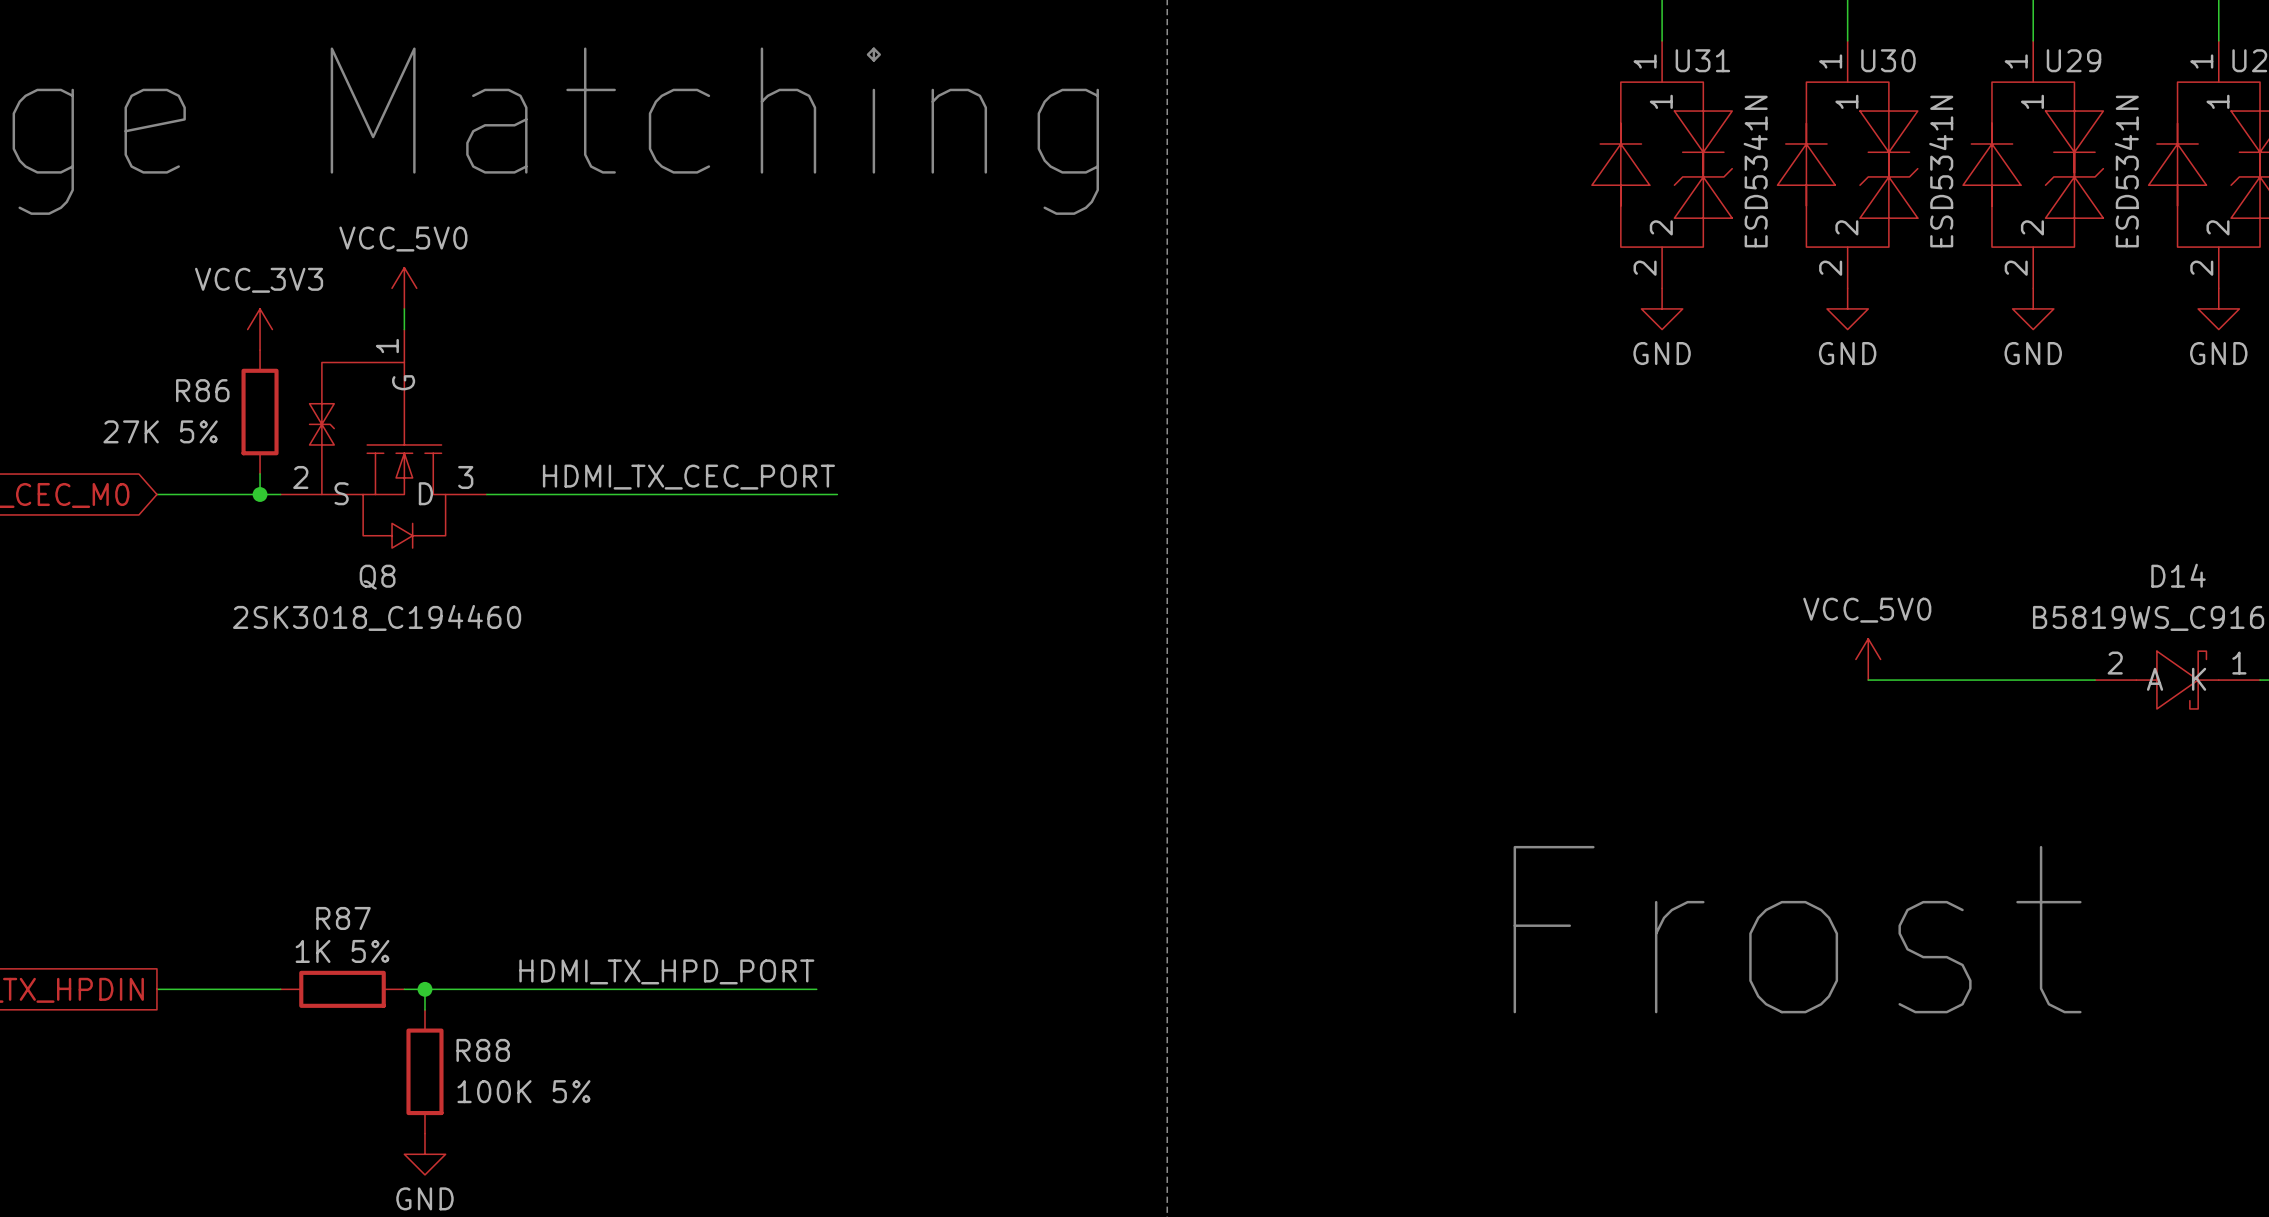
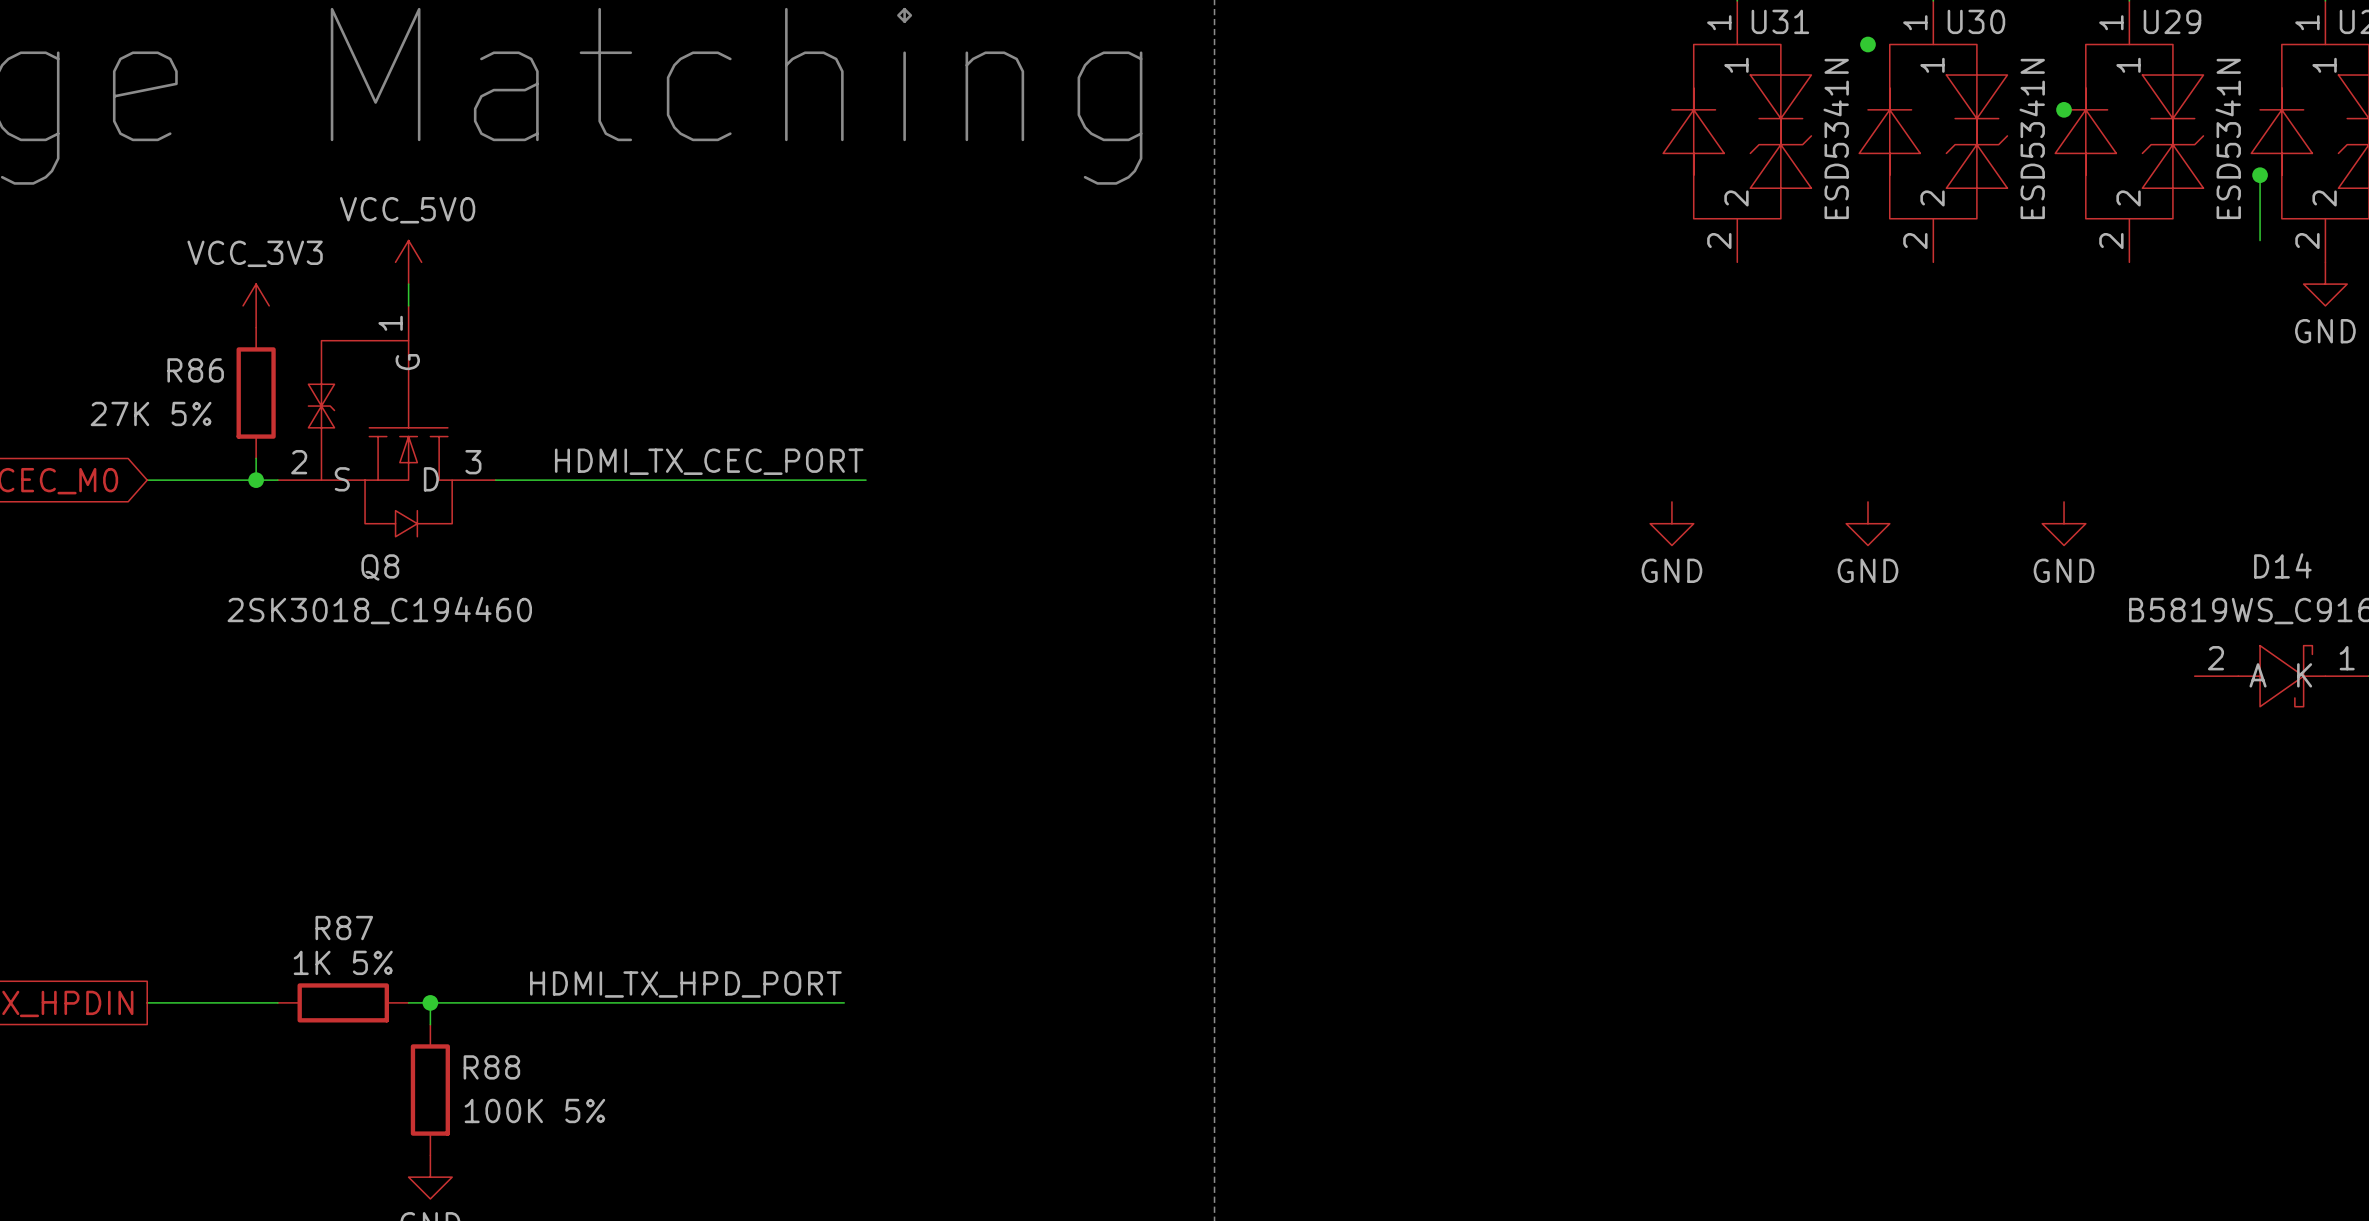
junction: none -> (1867, 44)
junction: none -> (2064, 109)
wire: none -> (2260, 175) (2260, 240)
junction: none -> (2260, 175)
power symbol: GND (1662, 308) -> none
power symbol: GND (1847, 308) -> none
power symbol: GND (2033, 308) -> none
power symbol: none -> GND (1671, 523)
power symbol: none -> GND (1867, 523)
power symbol: none -> GND (2064, 523)
power symbol: VCC_5V0 (1868, 659) -> none
wire: (1868, 680) (2095, 680) -> none
text: Frost (1797, 929) -> none

